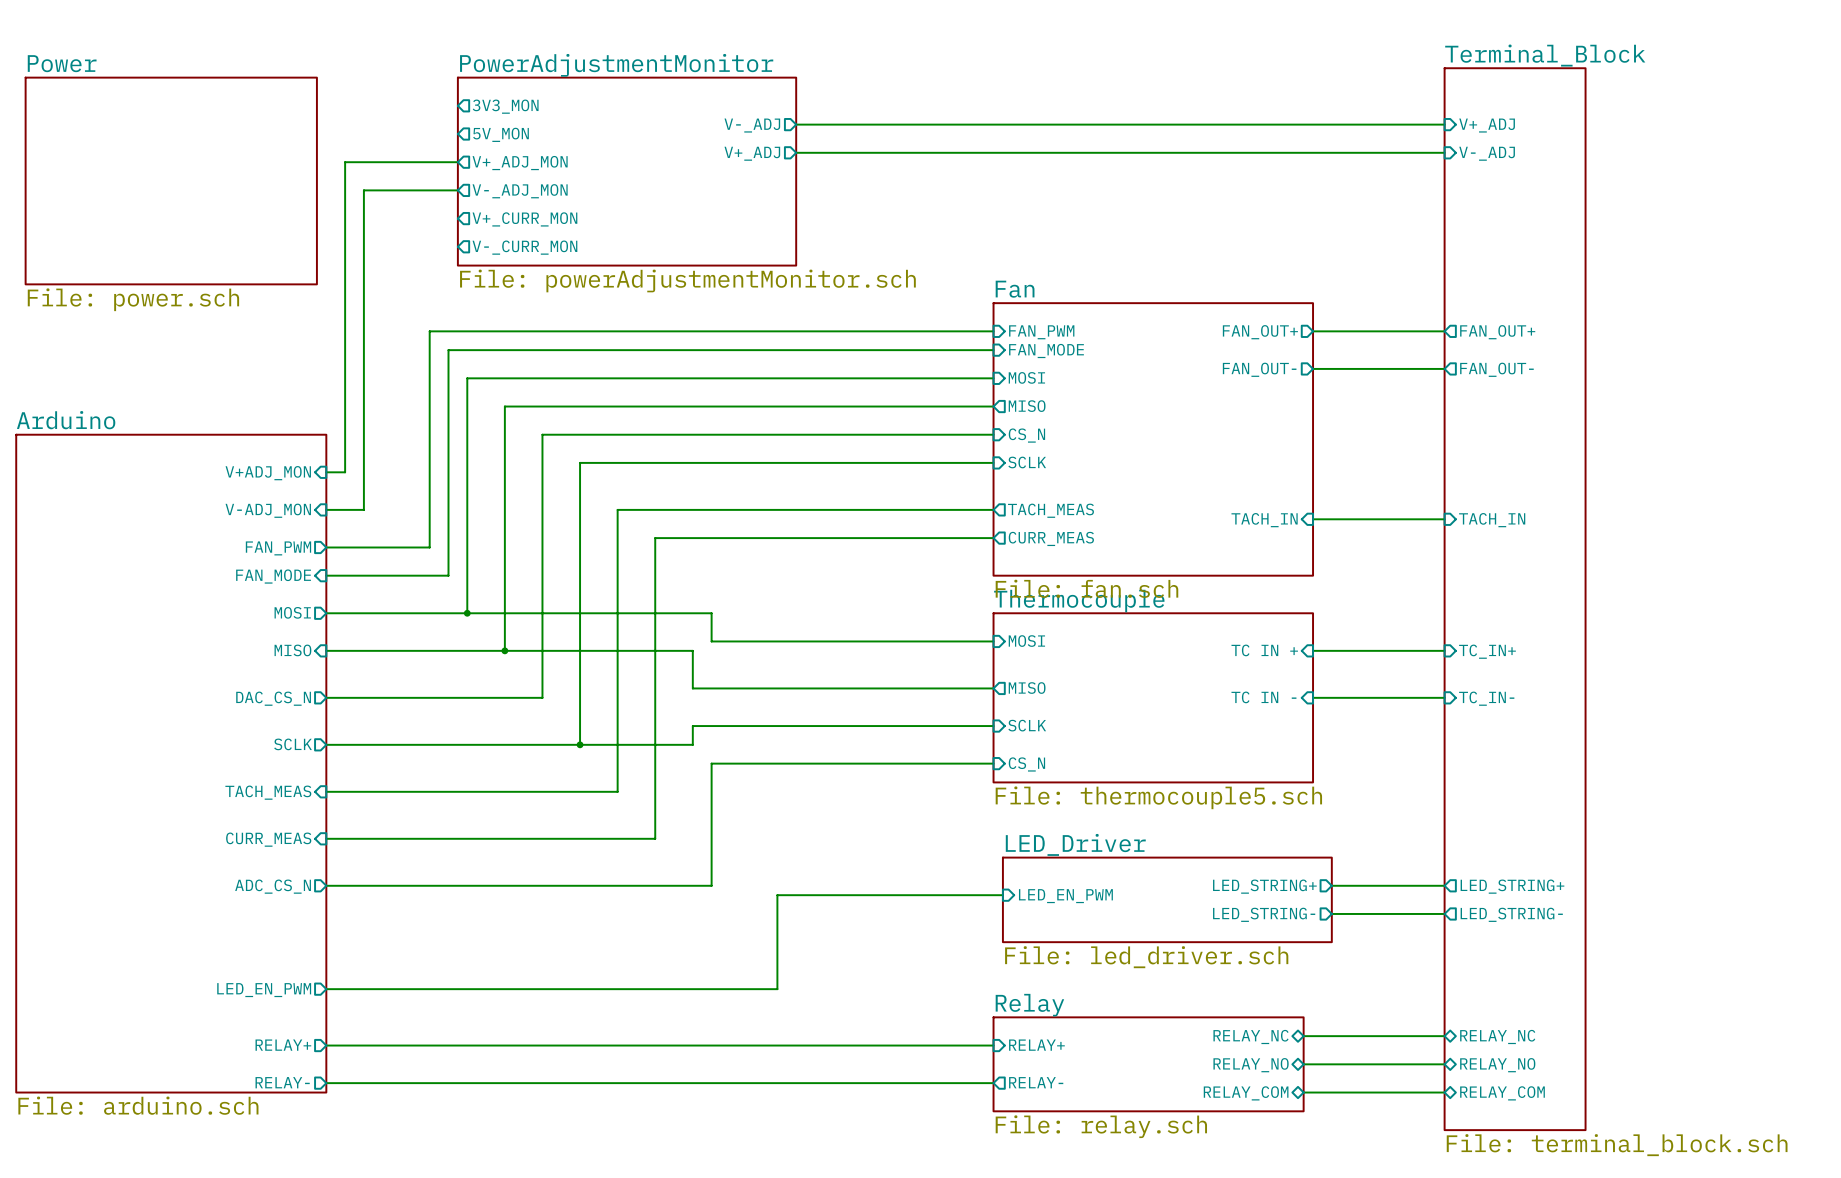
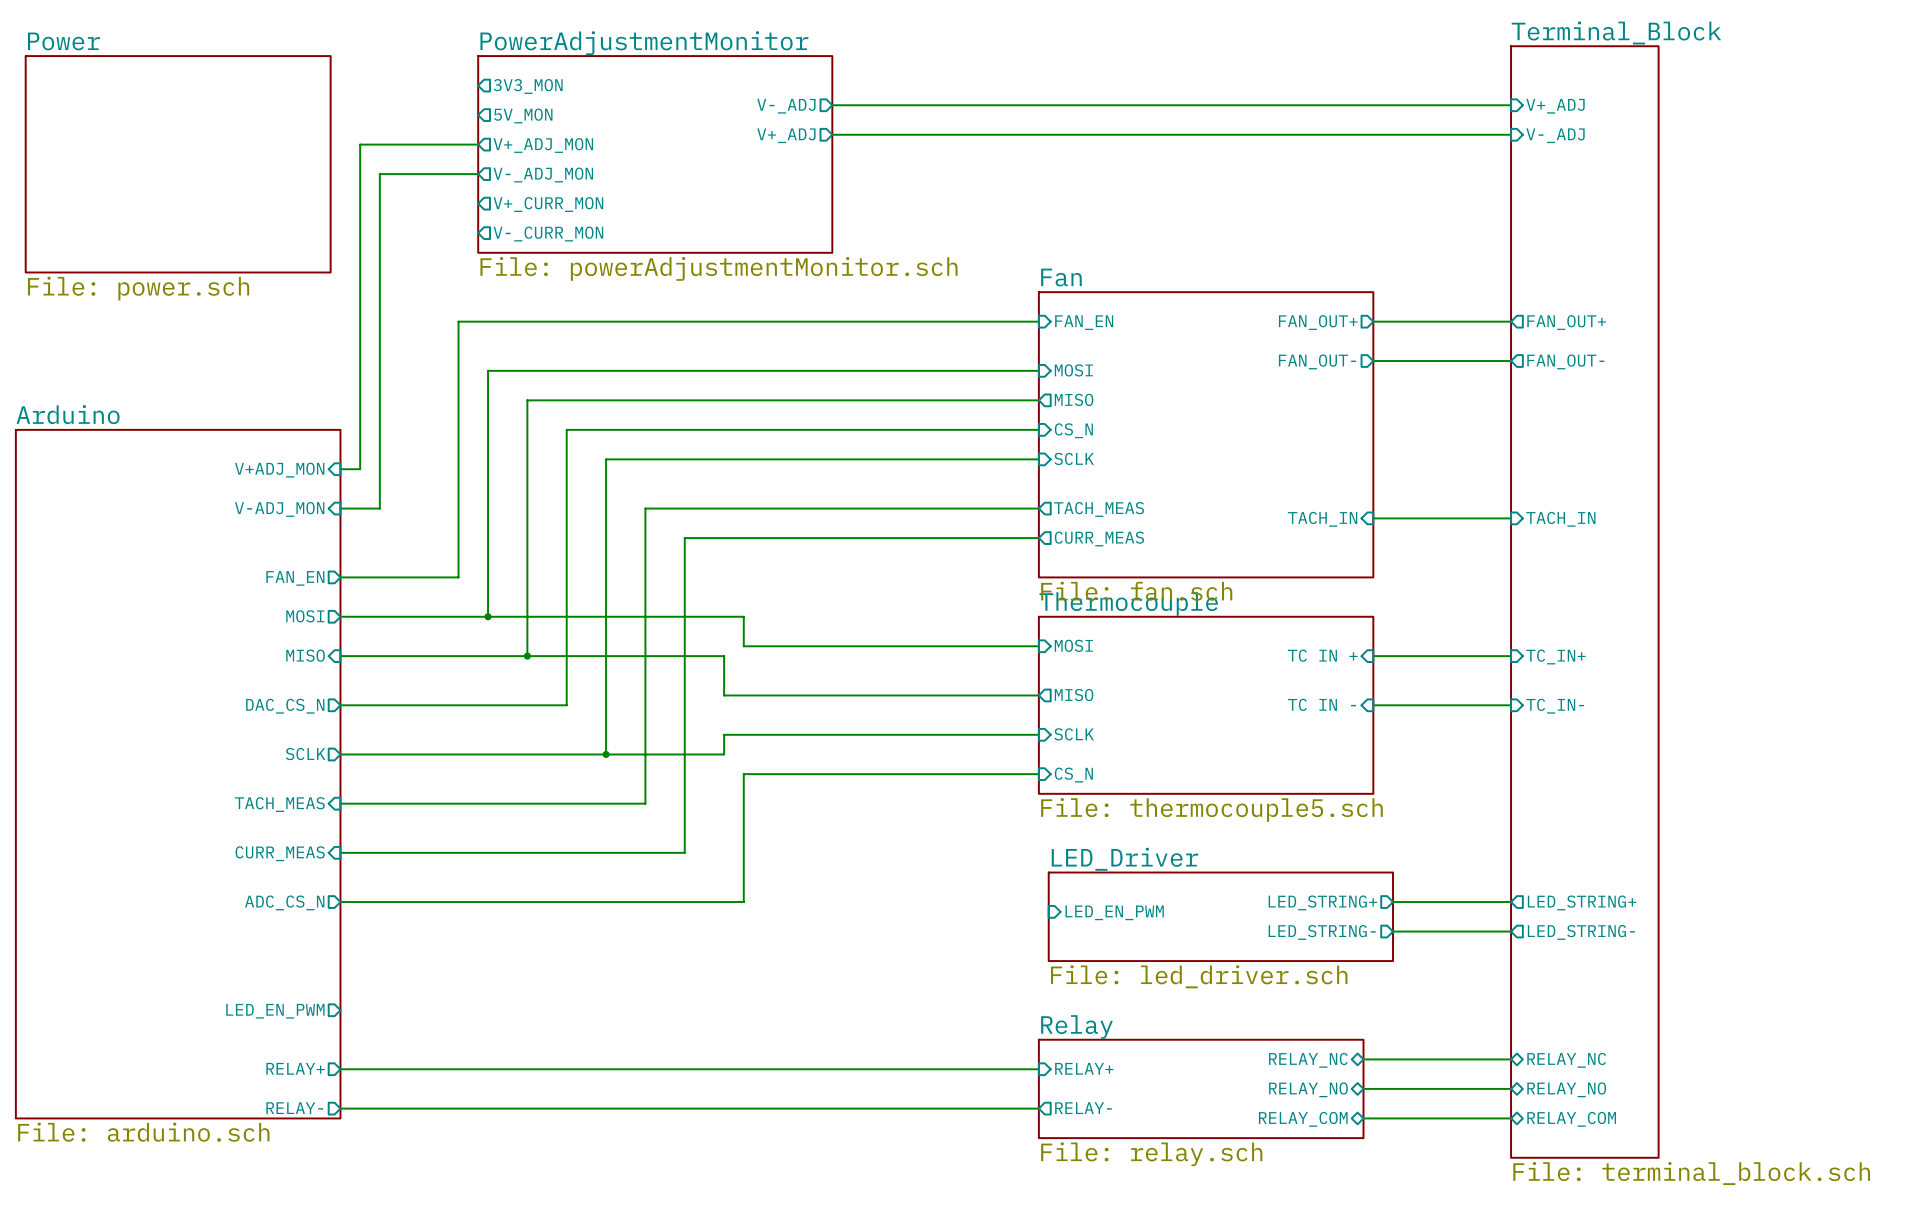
wire: (439, 331) (429, 331) (429, 547) (326, 547) -> (458, 321) (458, 577)
sheet pin: FAN_PWM (1041, 332) -> FAN_EN (1084, 322)
wire: (993, 350) (448, 350) (448, 575) (439, 575) -> none
sheet pin: FAN_MODE (1046, 350) -> none
sheet pin: FAN_PWM (278, 548) -> none
sheet pin shape: input (273, 576) -> output (295, 578)
sheet pin: FAN_MODE (273, 576) -> FAN_EN (295, 578)
wire: (1002, 895) (777, 895) (777, 989) (326, 989) -> none

